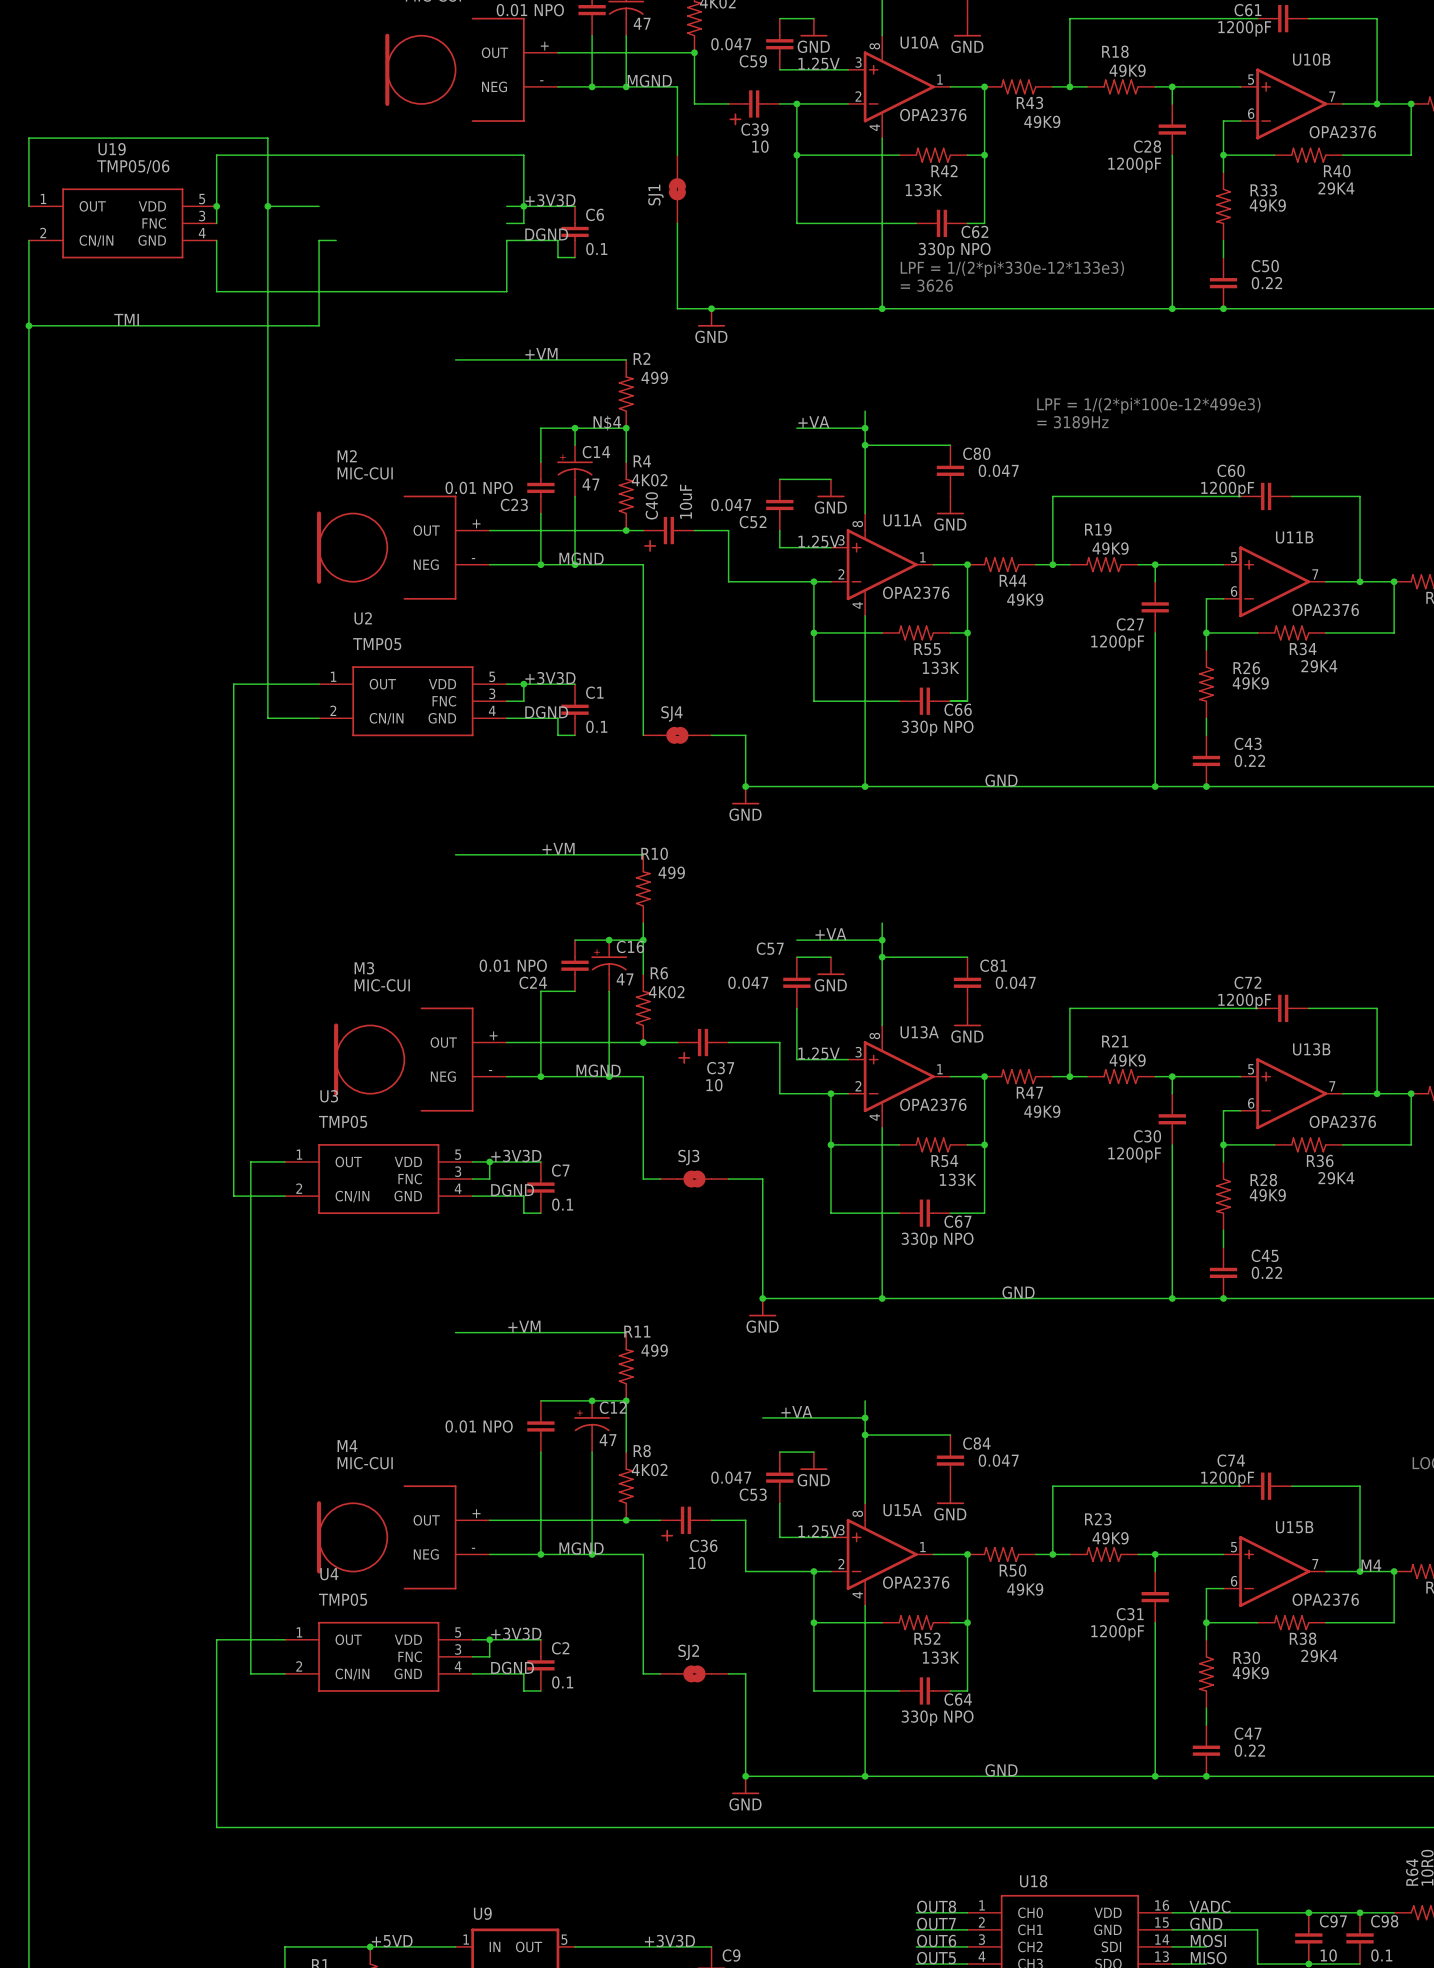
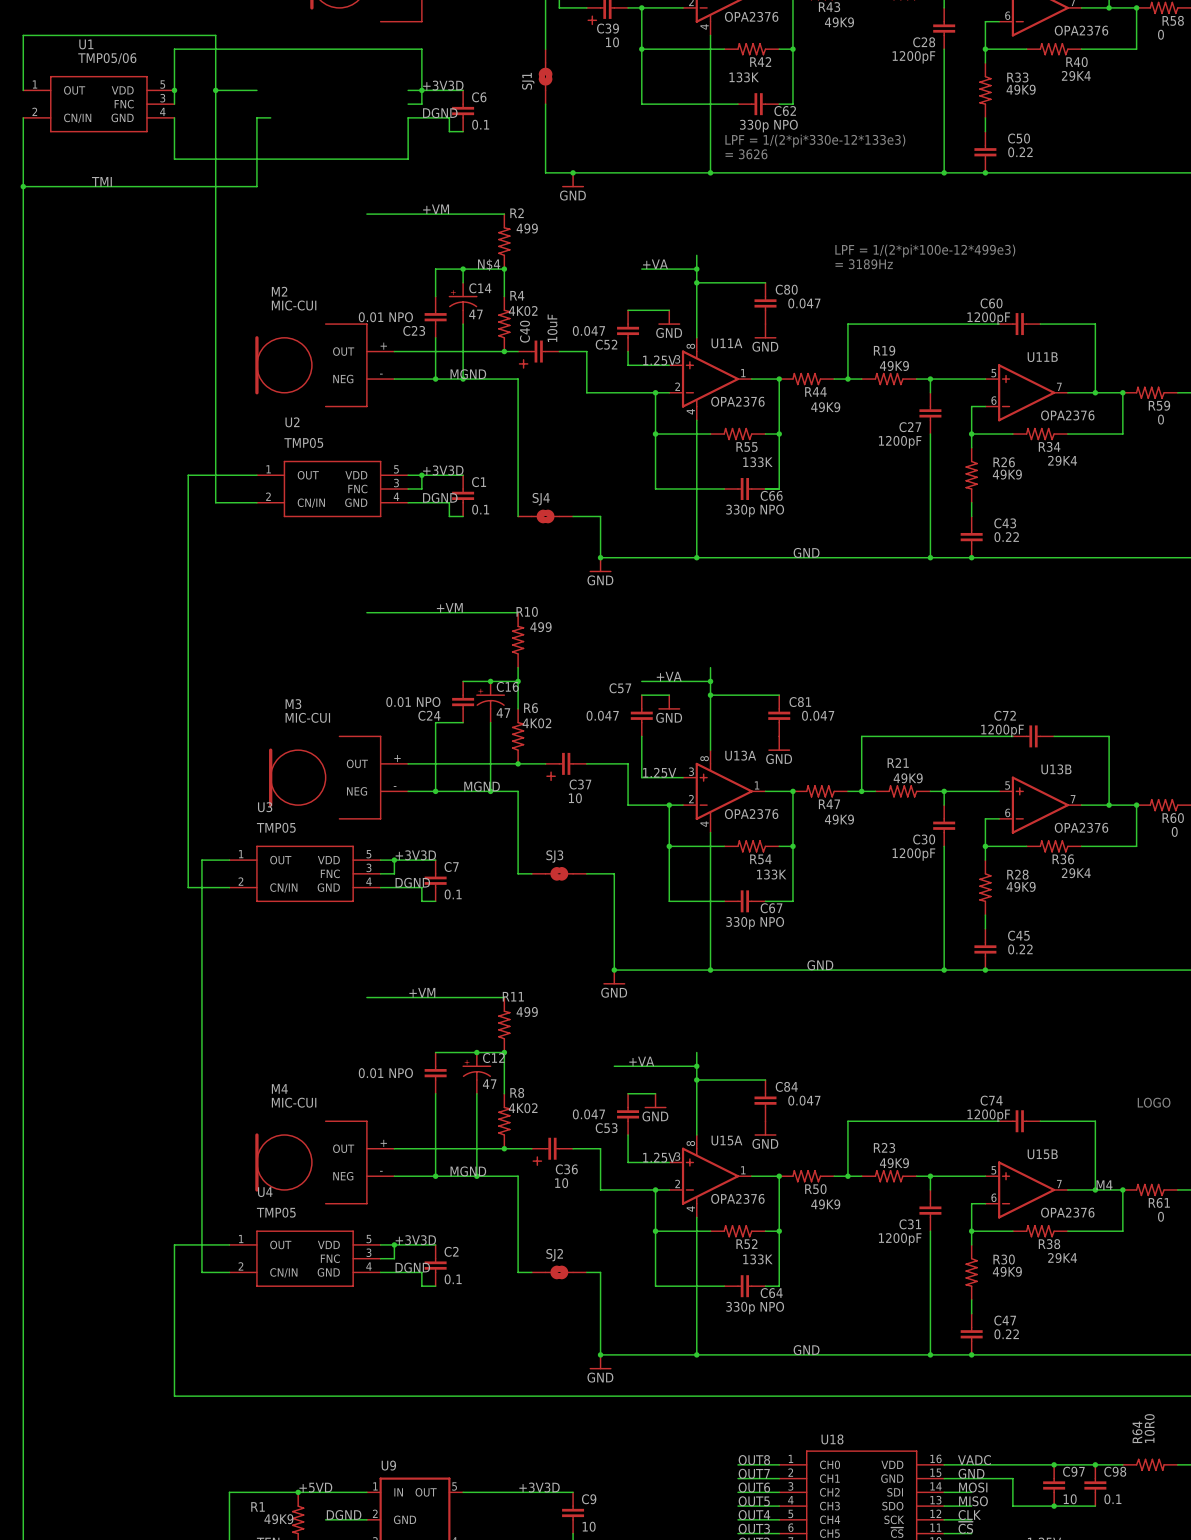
U19 name: U19 (112, 149) -> U1 (86, 44)

